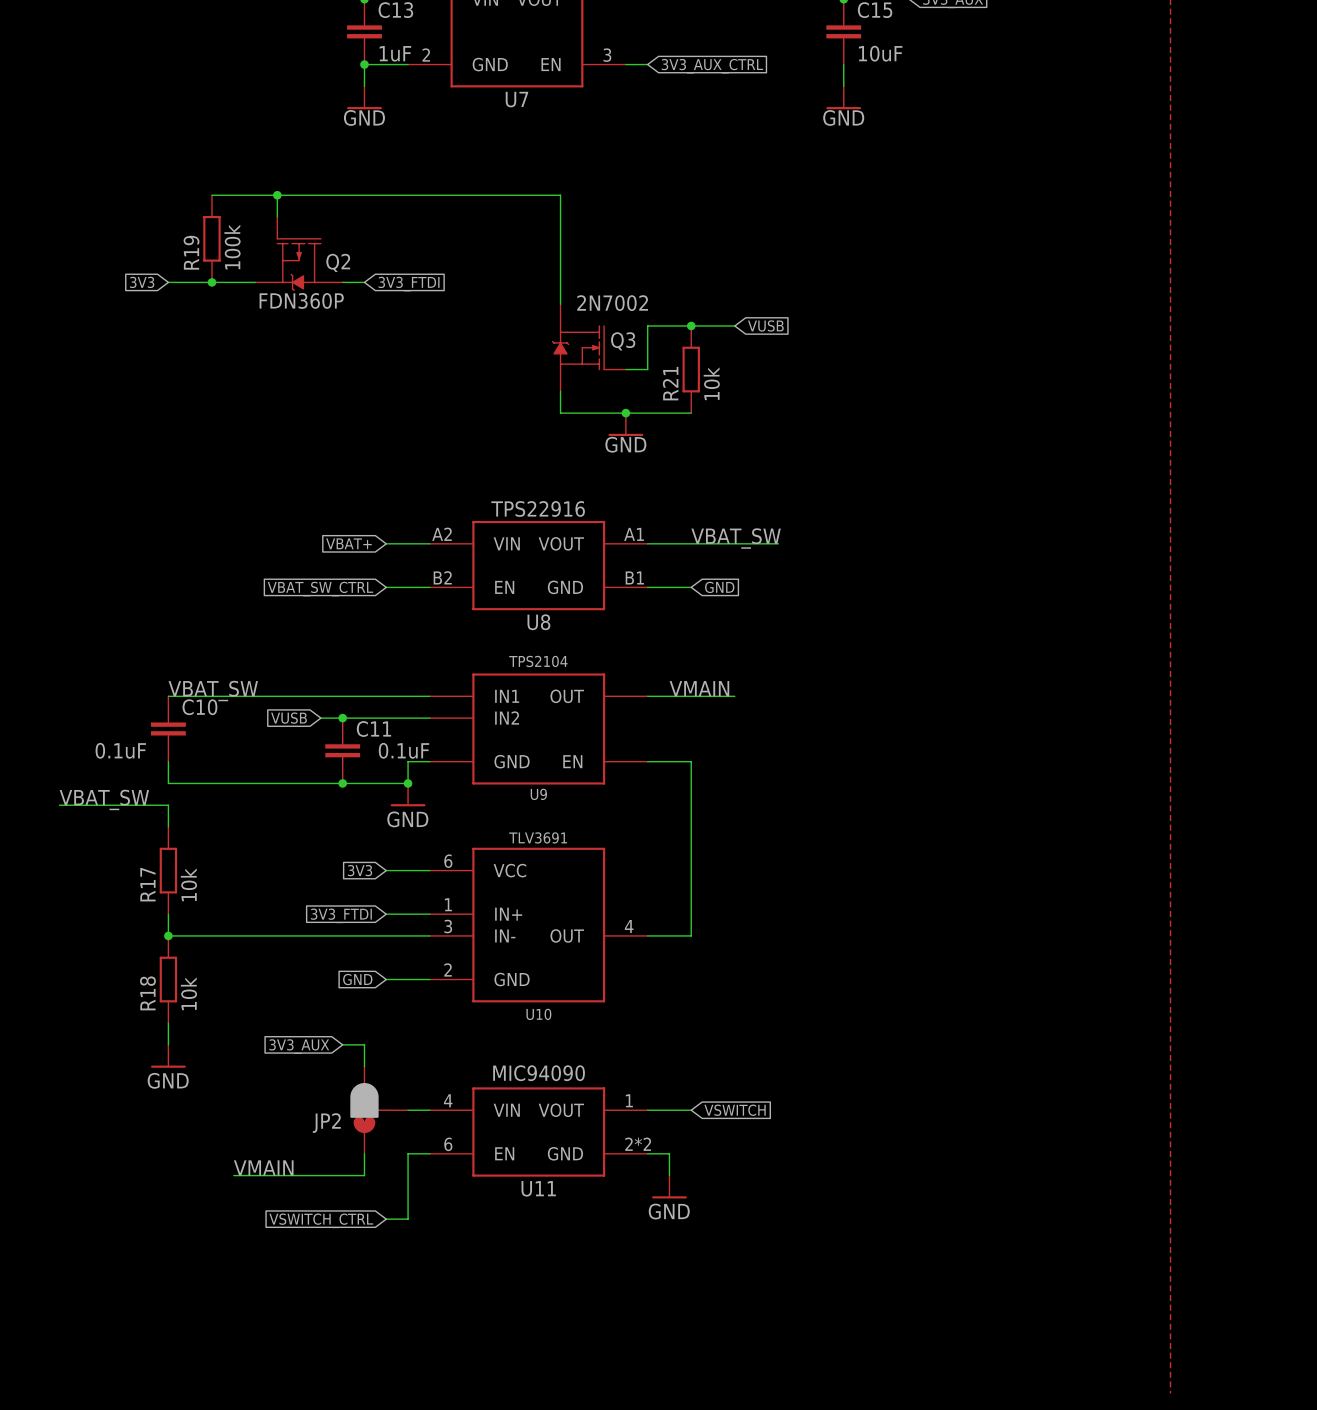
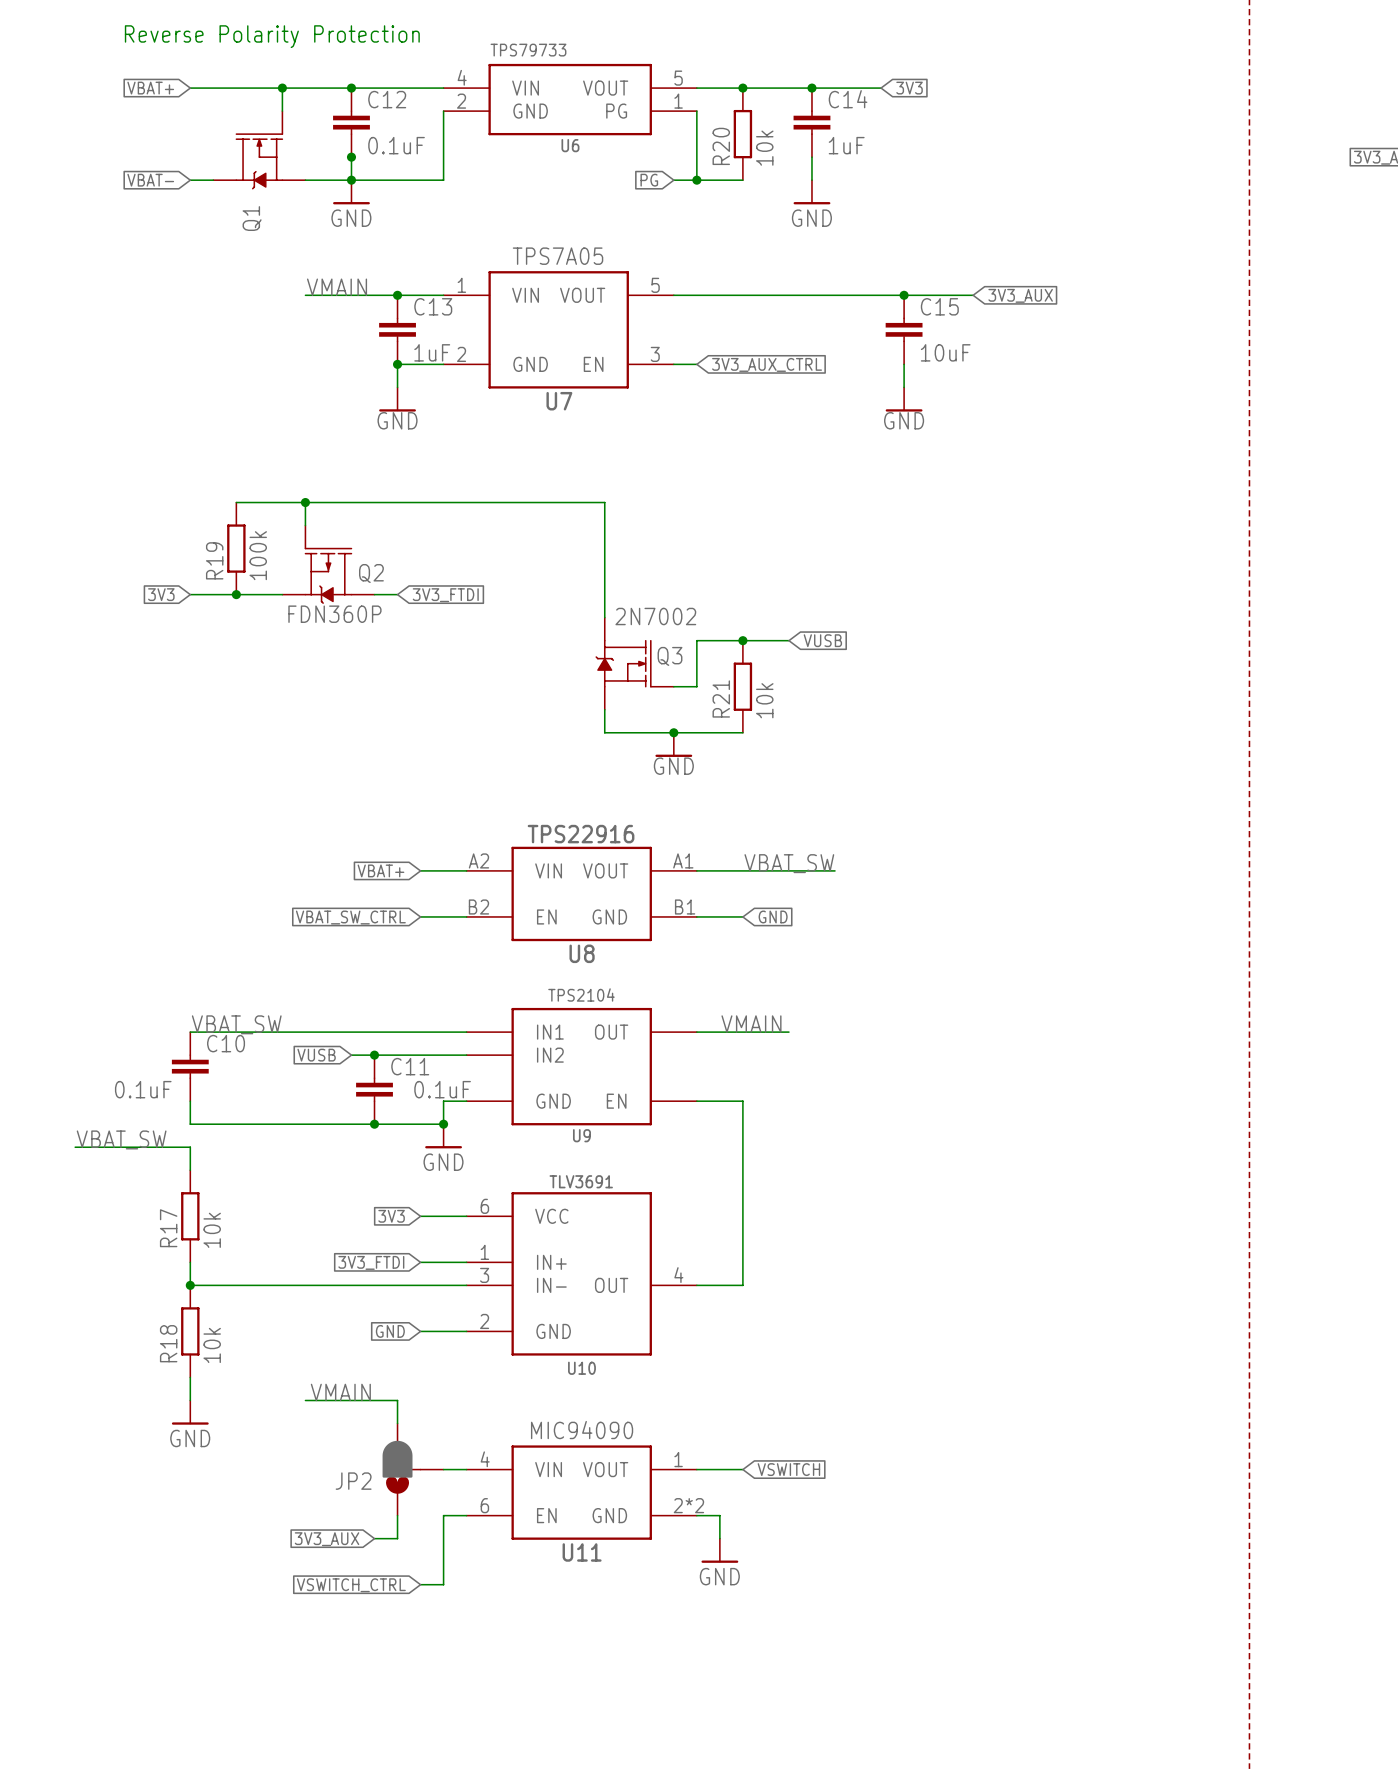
wire: none -> (305, 1400) (374, 1400)
global label position: 3V3_AUX (299, 1046) -> 3V3_AUX (327, 1539)
label position: VMAIN (263, 1167) -> VMAIN (340, 1392)
wire: (233, 1175) (342, 1175) -> none

